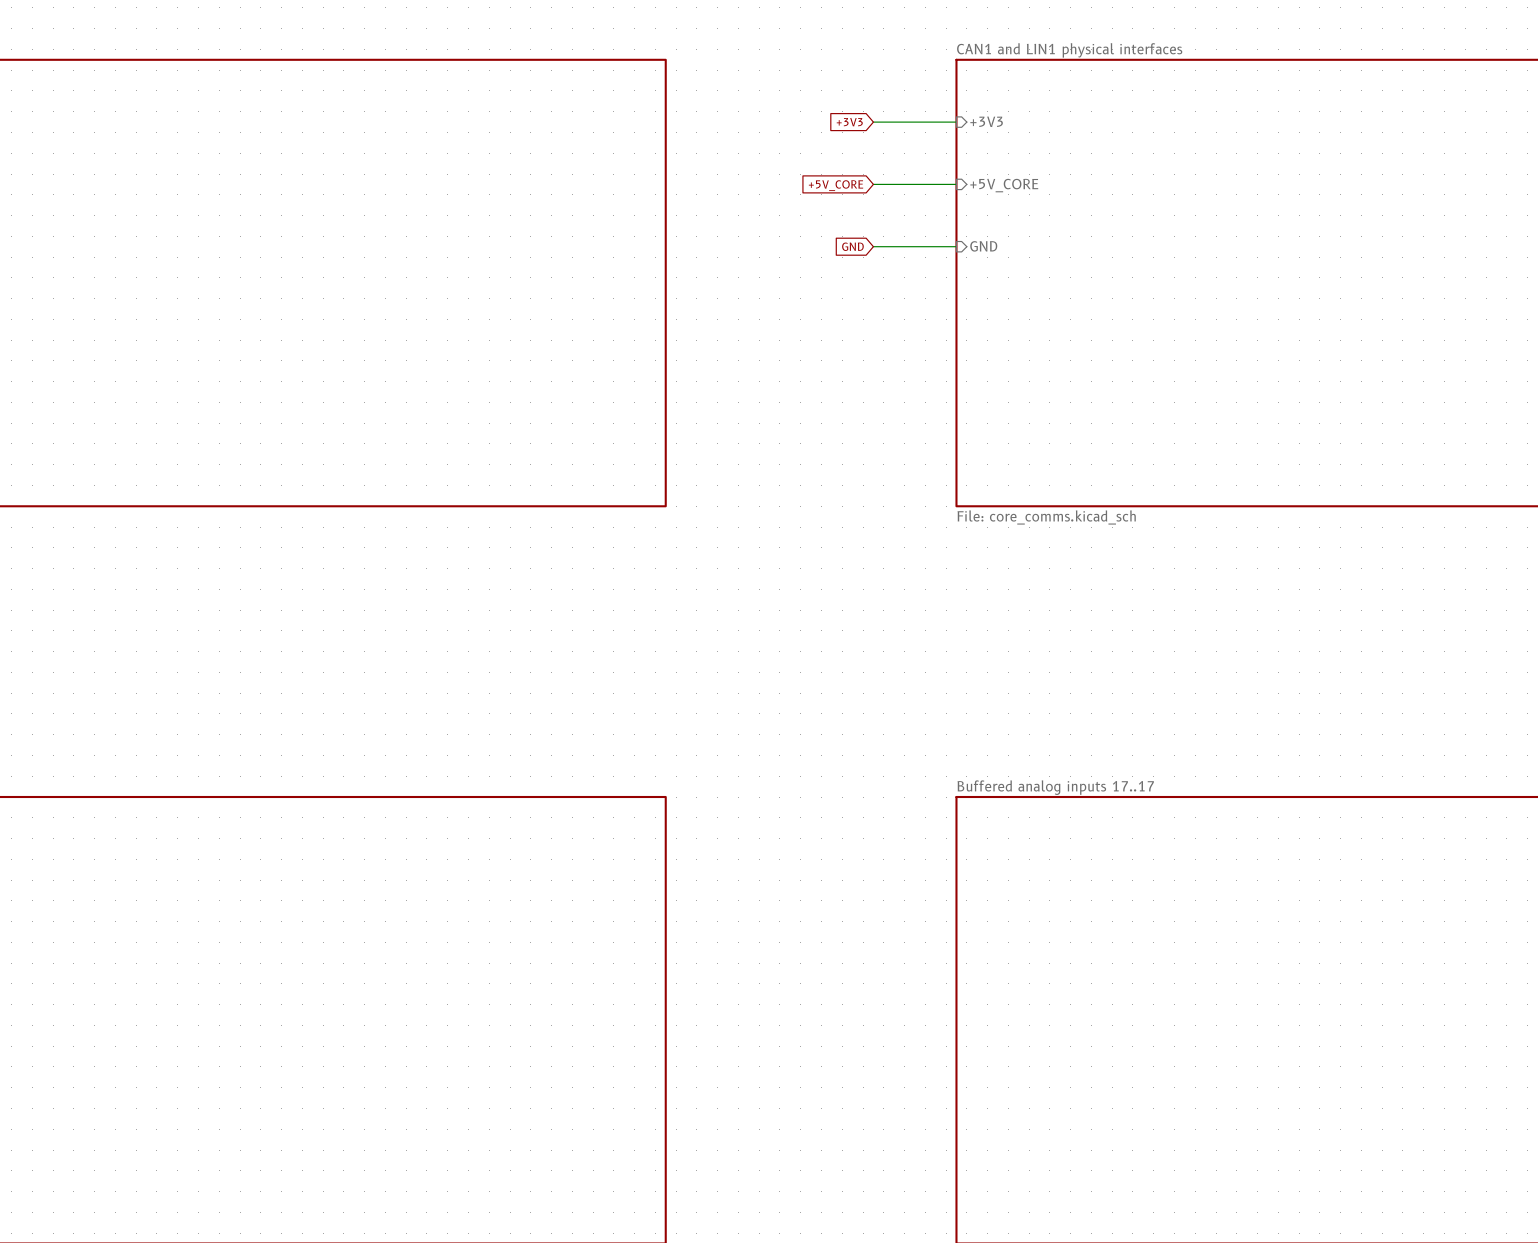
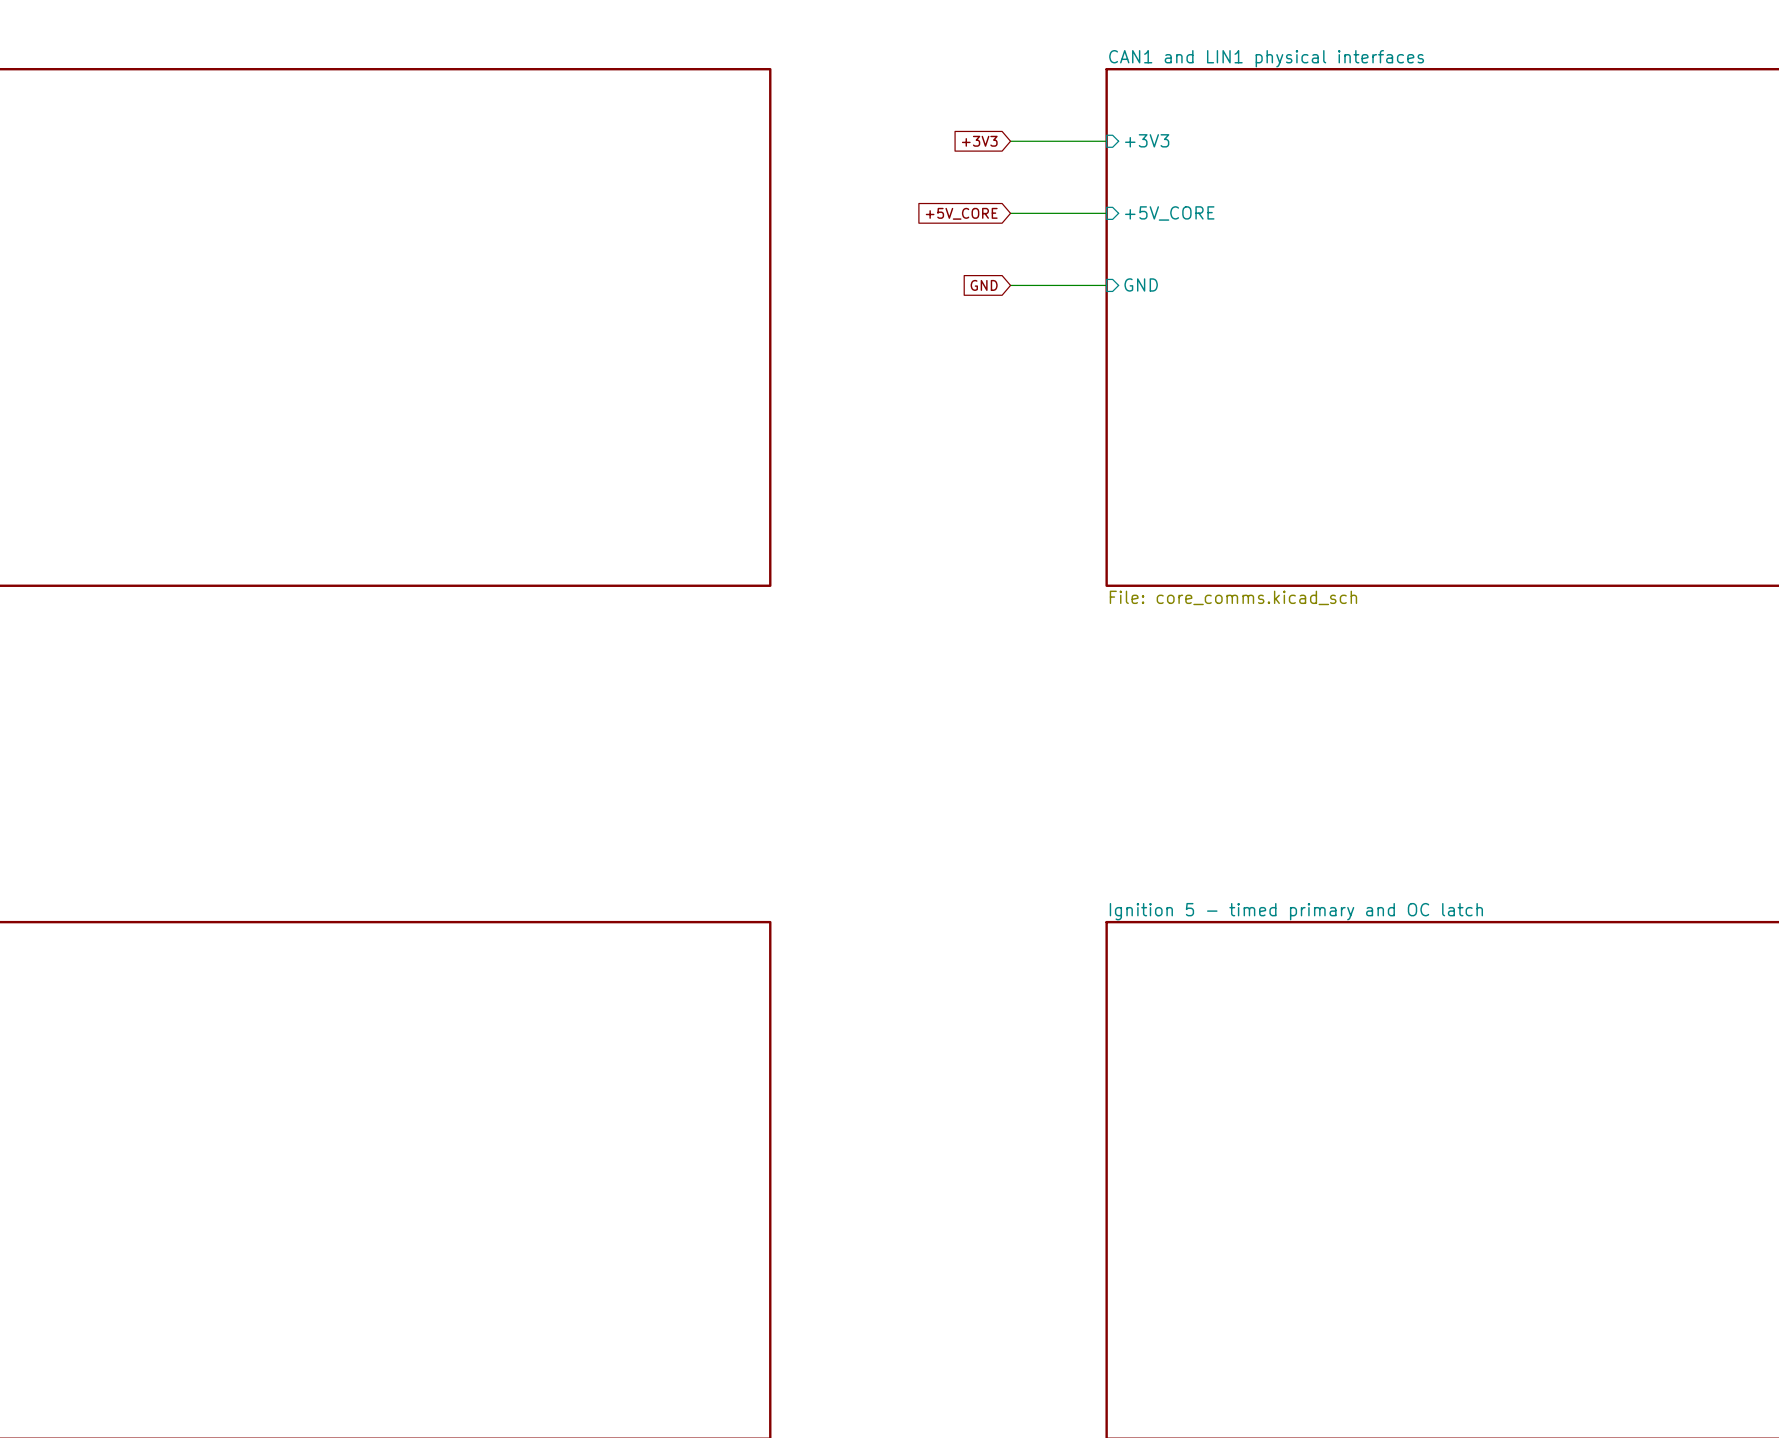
sheet Buffered analog inputs 17..17 name: Buffered analog inputs 17..17 (1055, 787) -> Ignition 5 - timed primary and OC latch (1296, 911)

